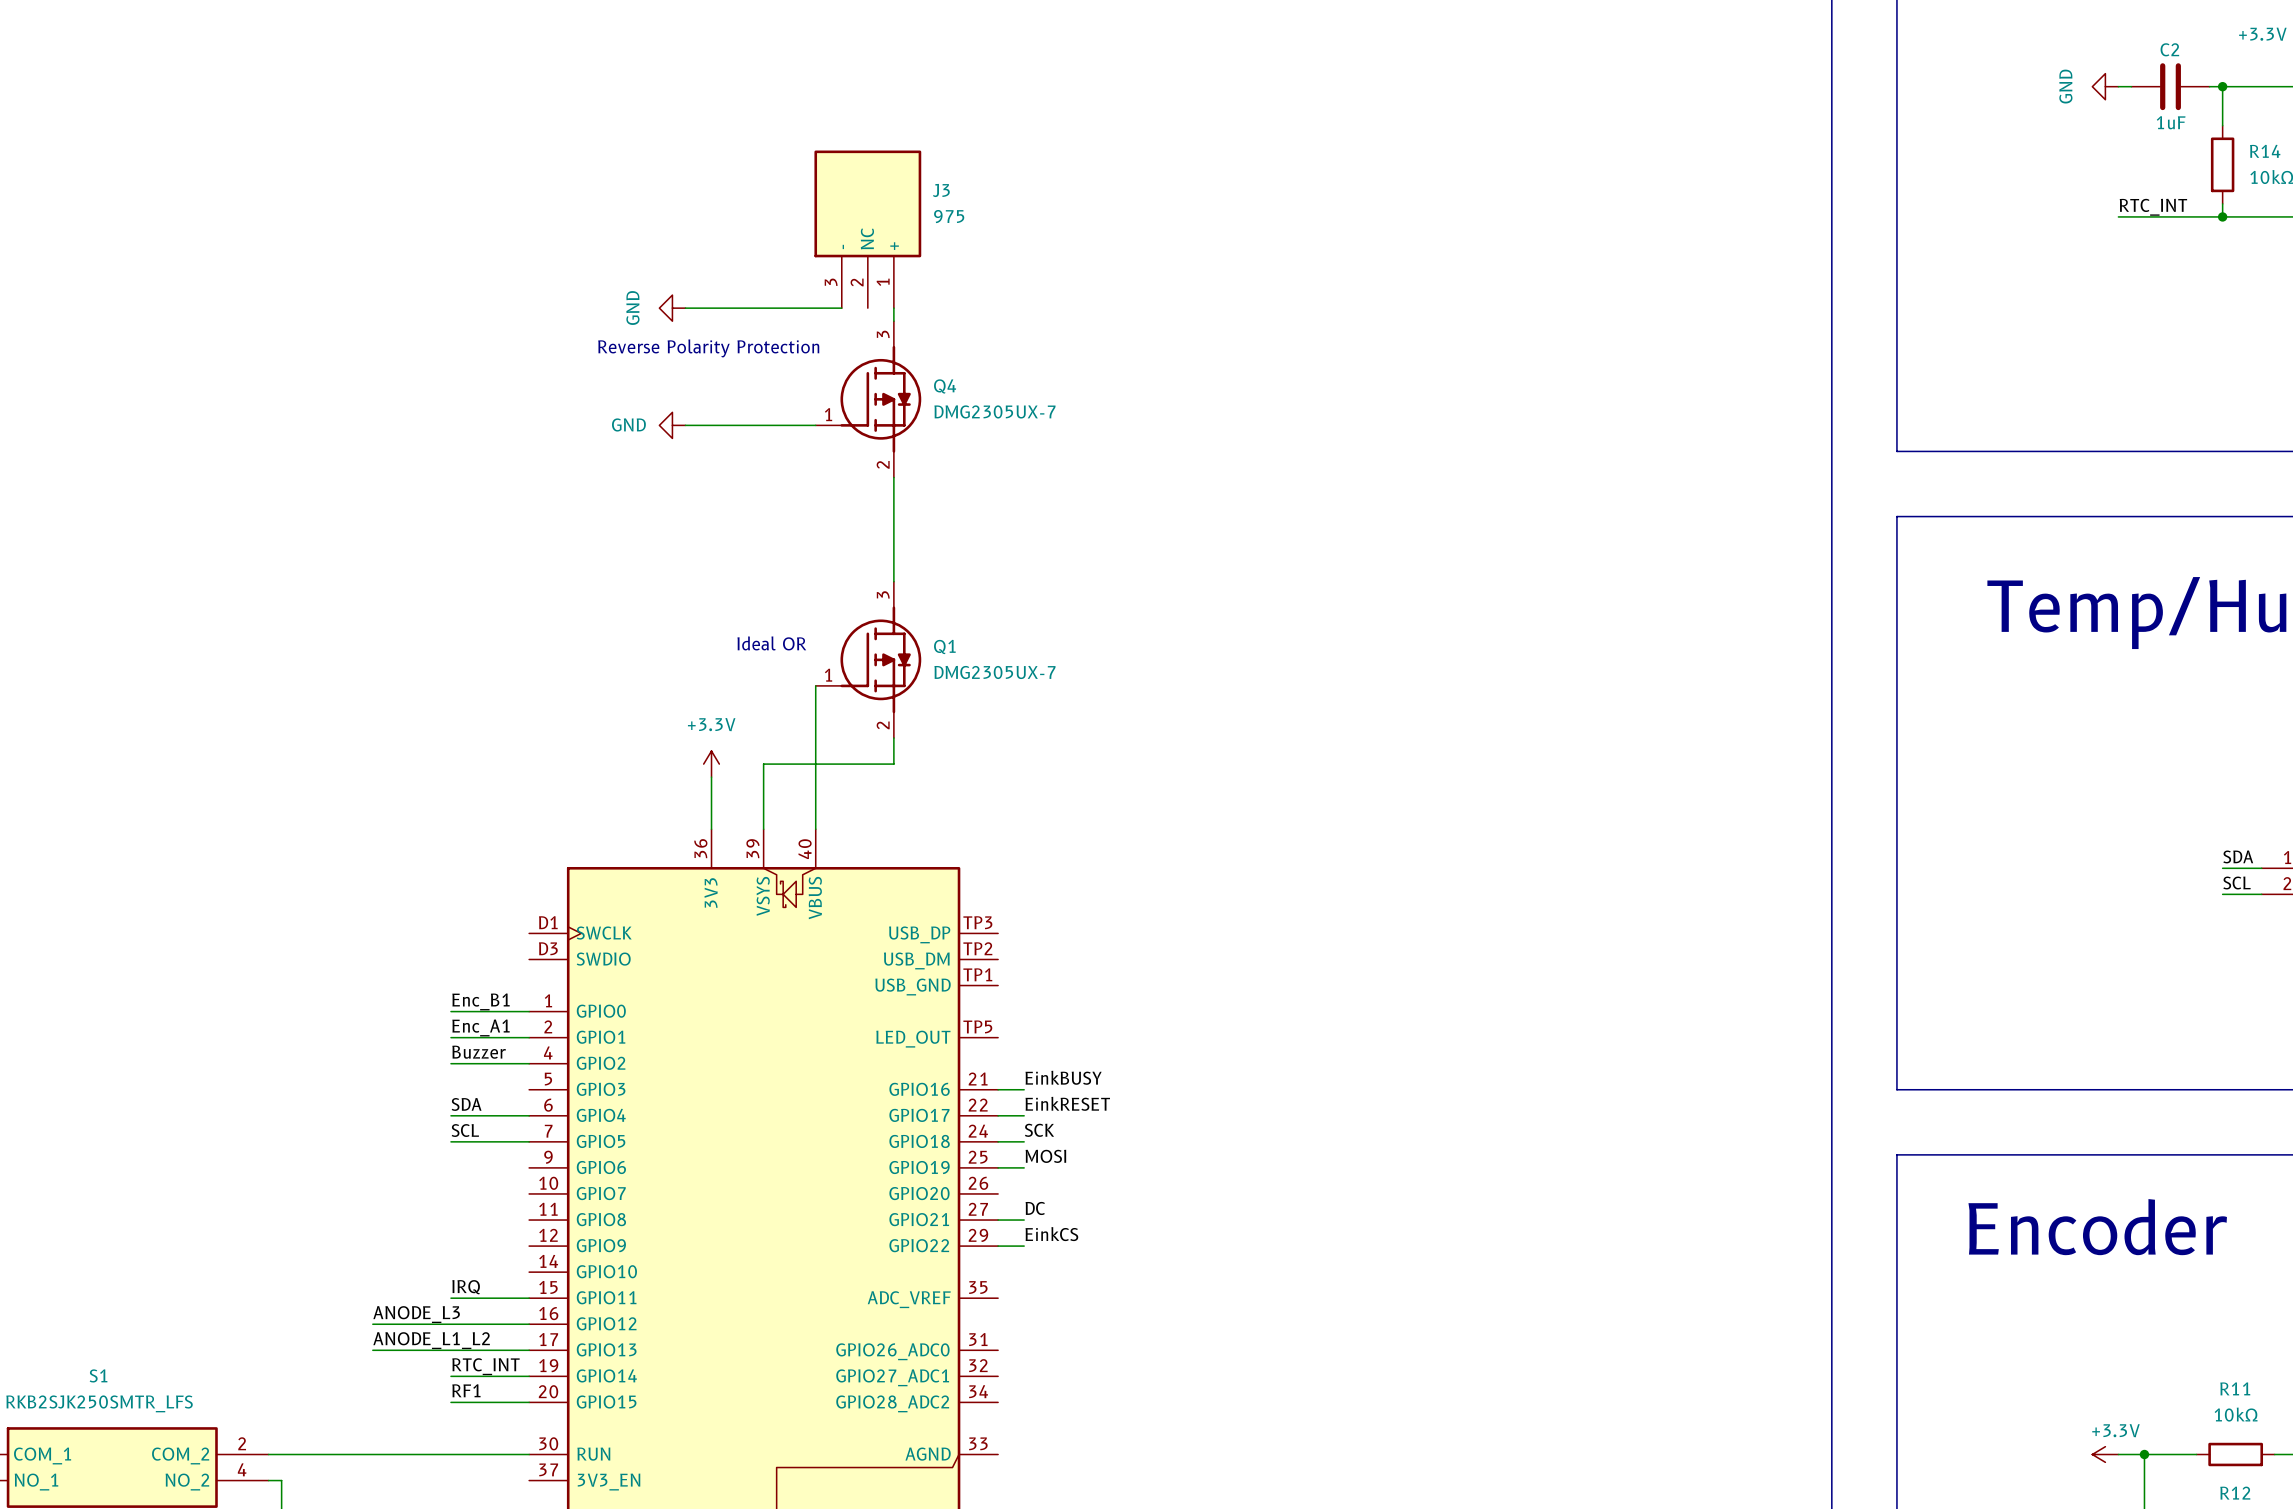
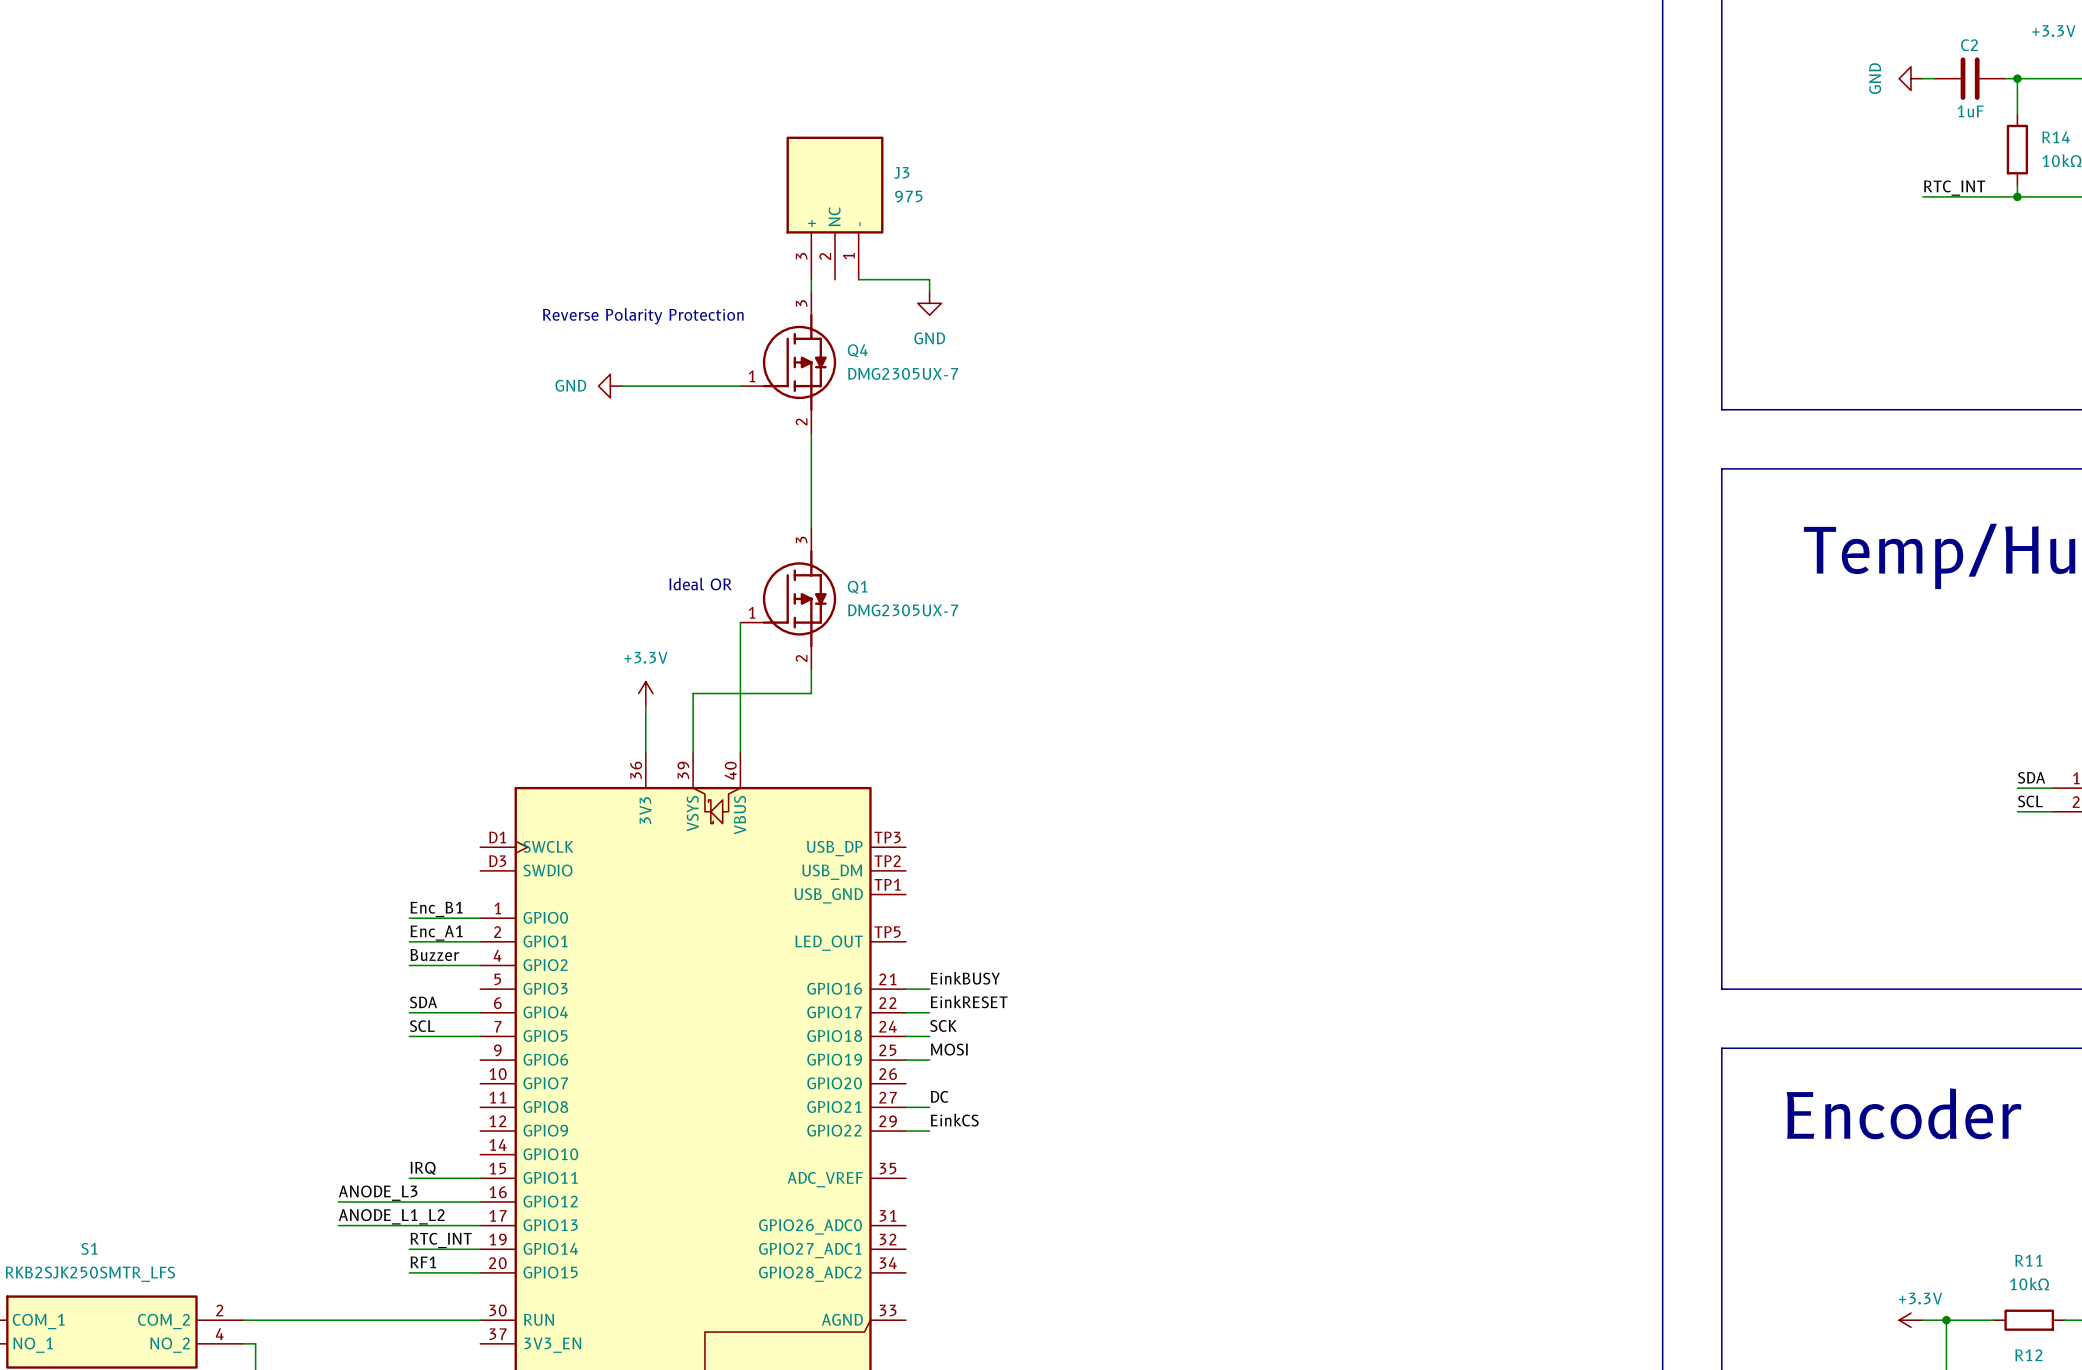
J3 position: (867, 229) -> (835, 208)
J3 pin name: - (843, 246) -> + (811, 223)
J3 pin name: + (894, 246) -> - (860, 224)
power symbol: GND (672, 308) -> none
wire: (685, 308) (841, 308) -> none
wire: none -> (858, 279) (929, 279) (929, 291)
power symbol: none -> GND (929, 303)

